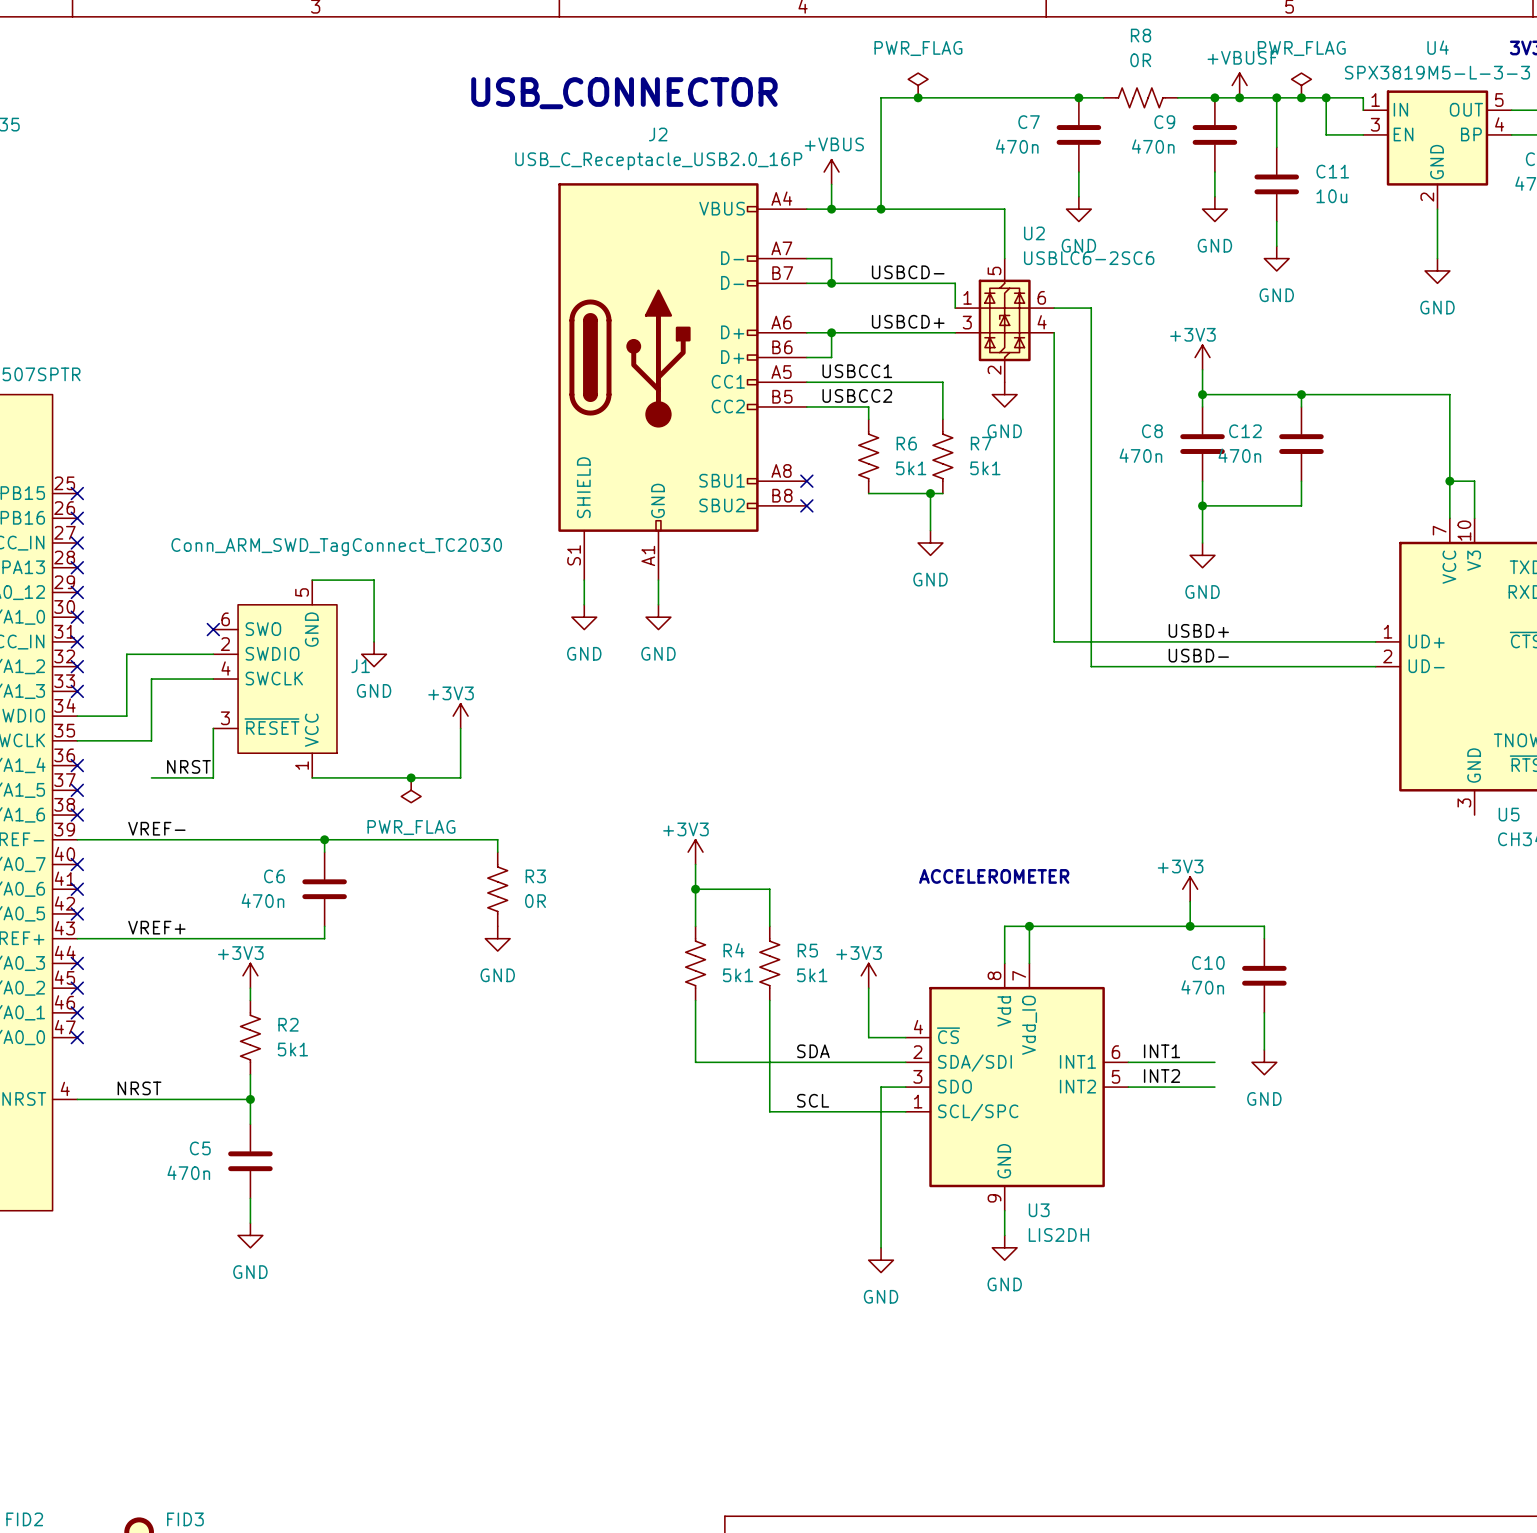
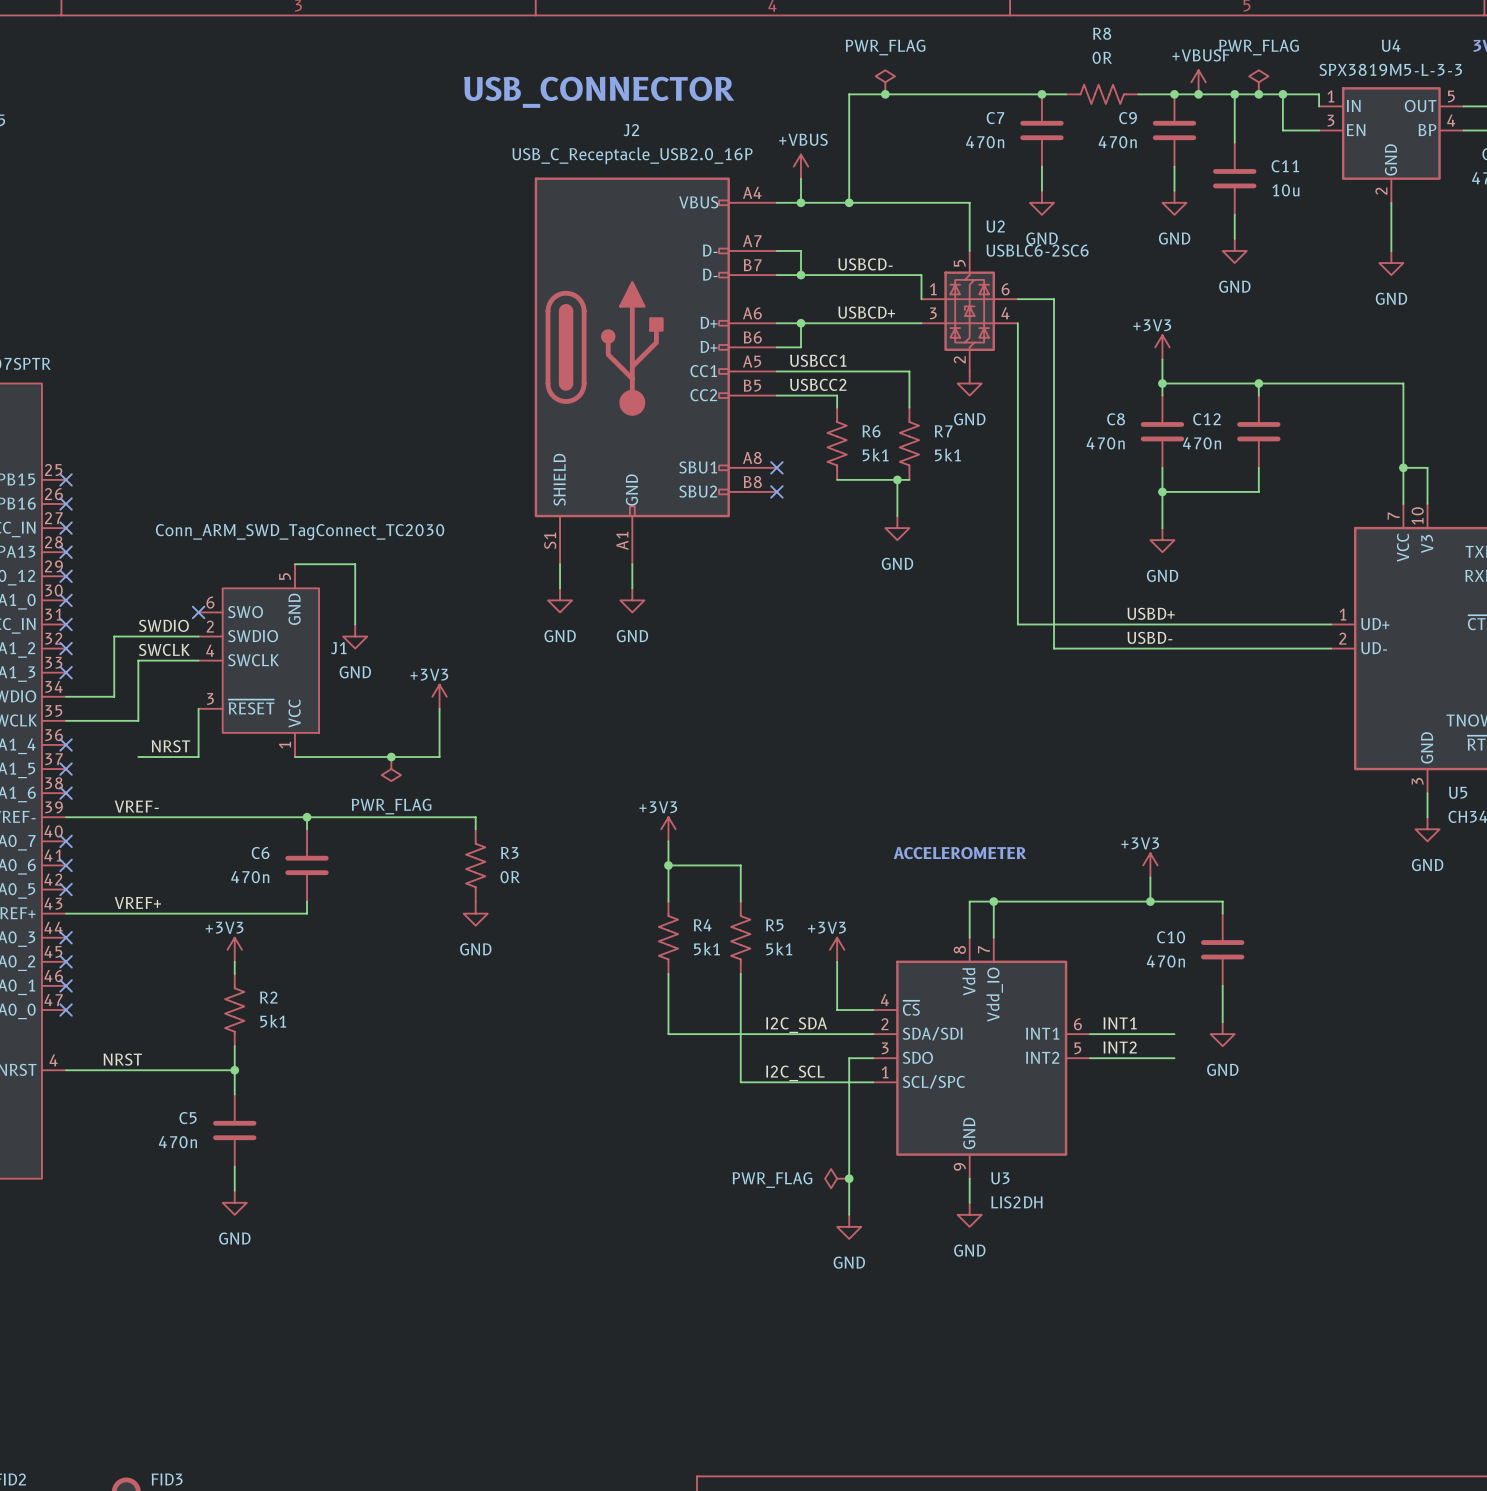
label: none -> SWDIO (163, 625)
label: none -> SWCLK (164, 649)
wire: none -> (1427, 793) (1427, 817)
power symbol: none -> GND (1427, 829)
label: SDA (813, 1051) -> I2C_SDA (796, 1025)
label: SCL (813, 1100) -> I2C_SCL (795, 1073)
power symbol: none -> PWR_FLAG (837, 1178)
junction: none -> (849, 1178)

